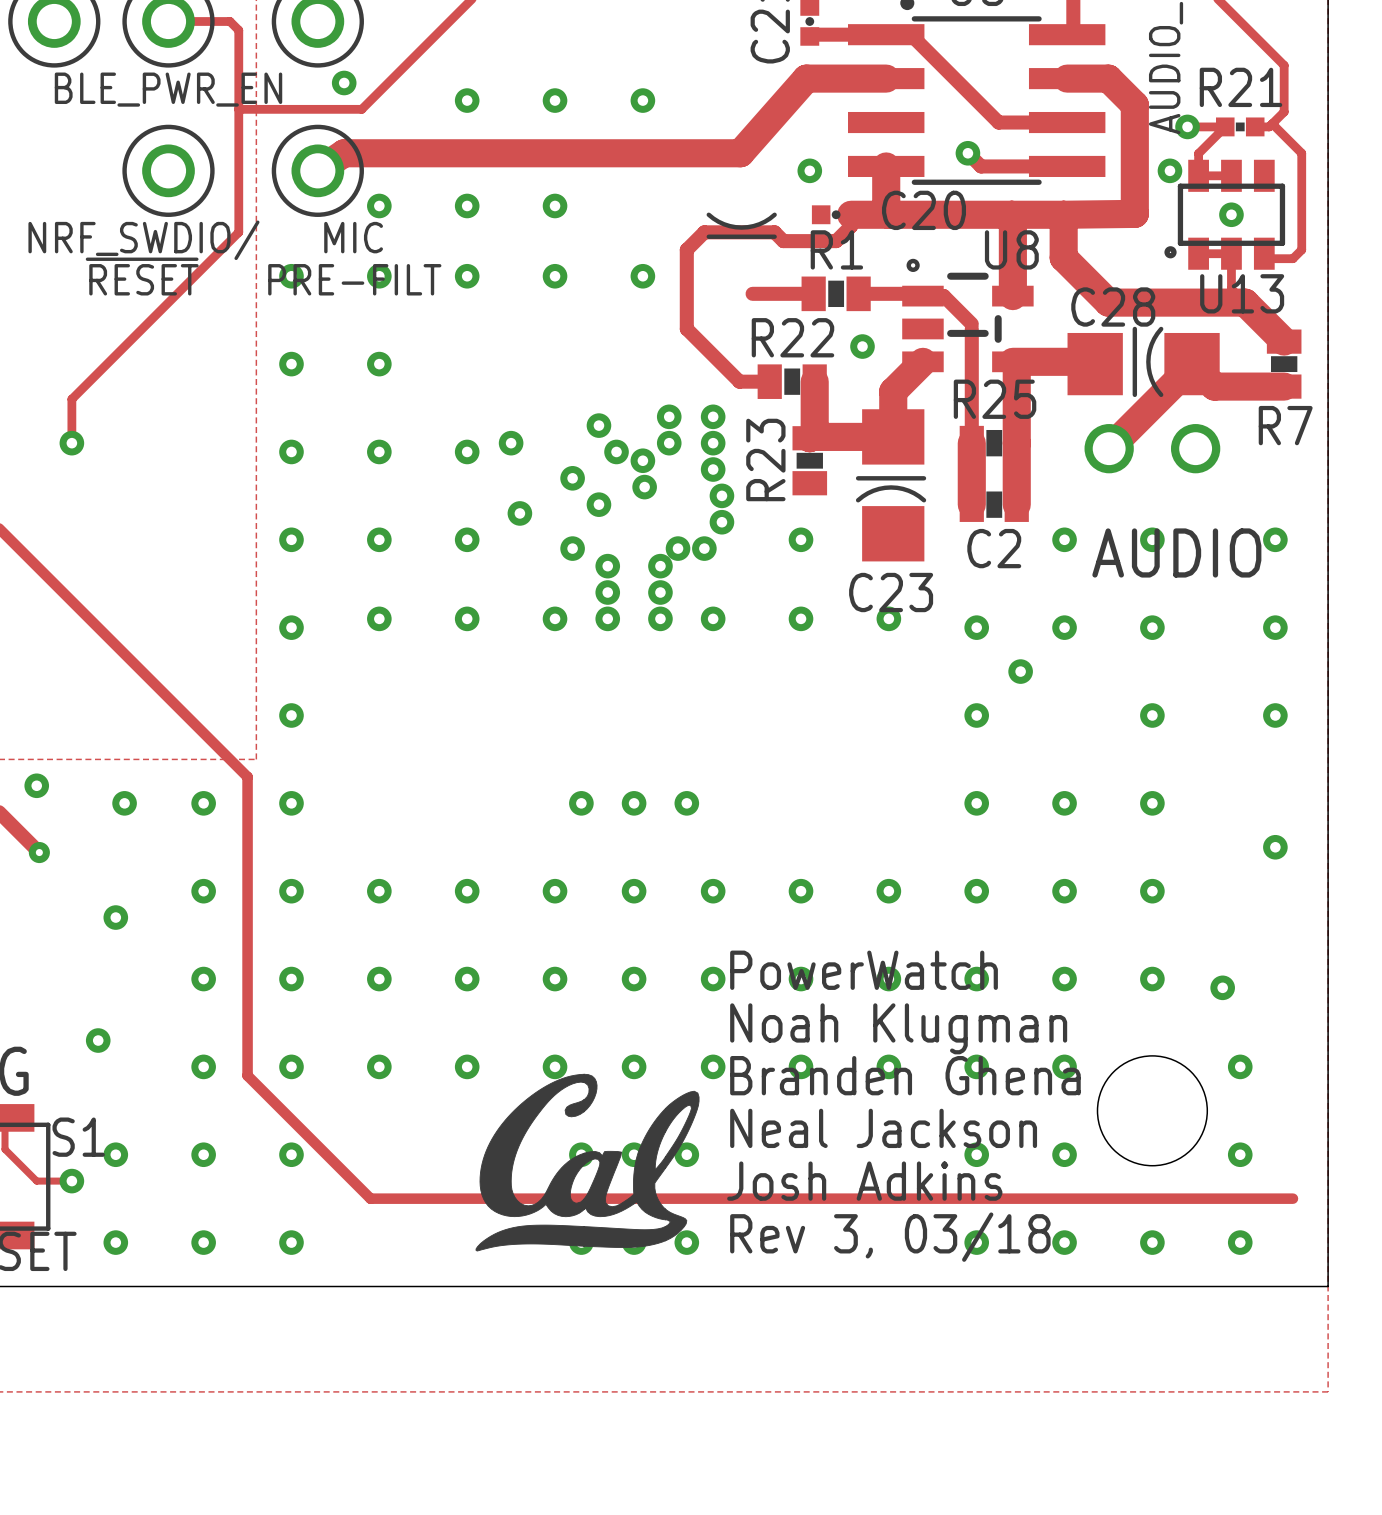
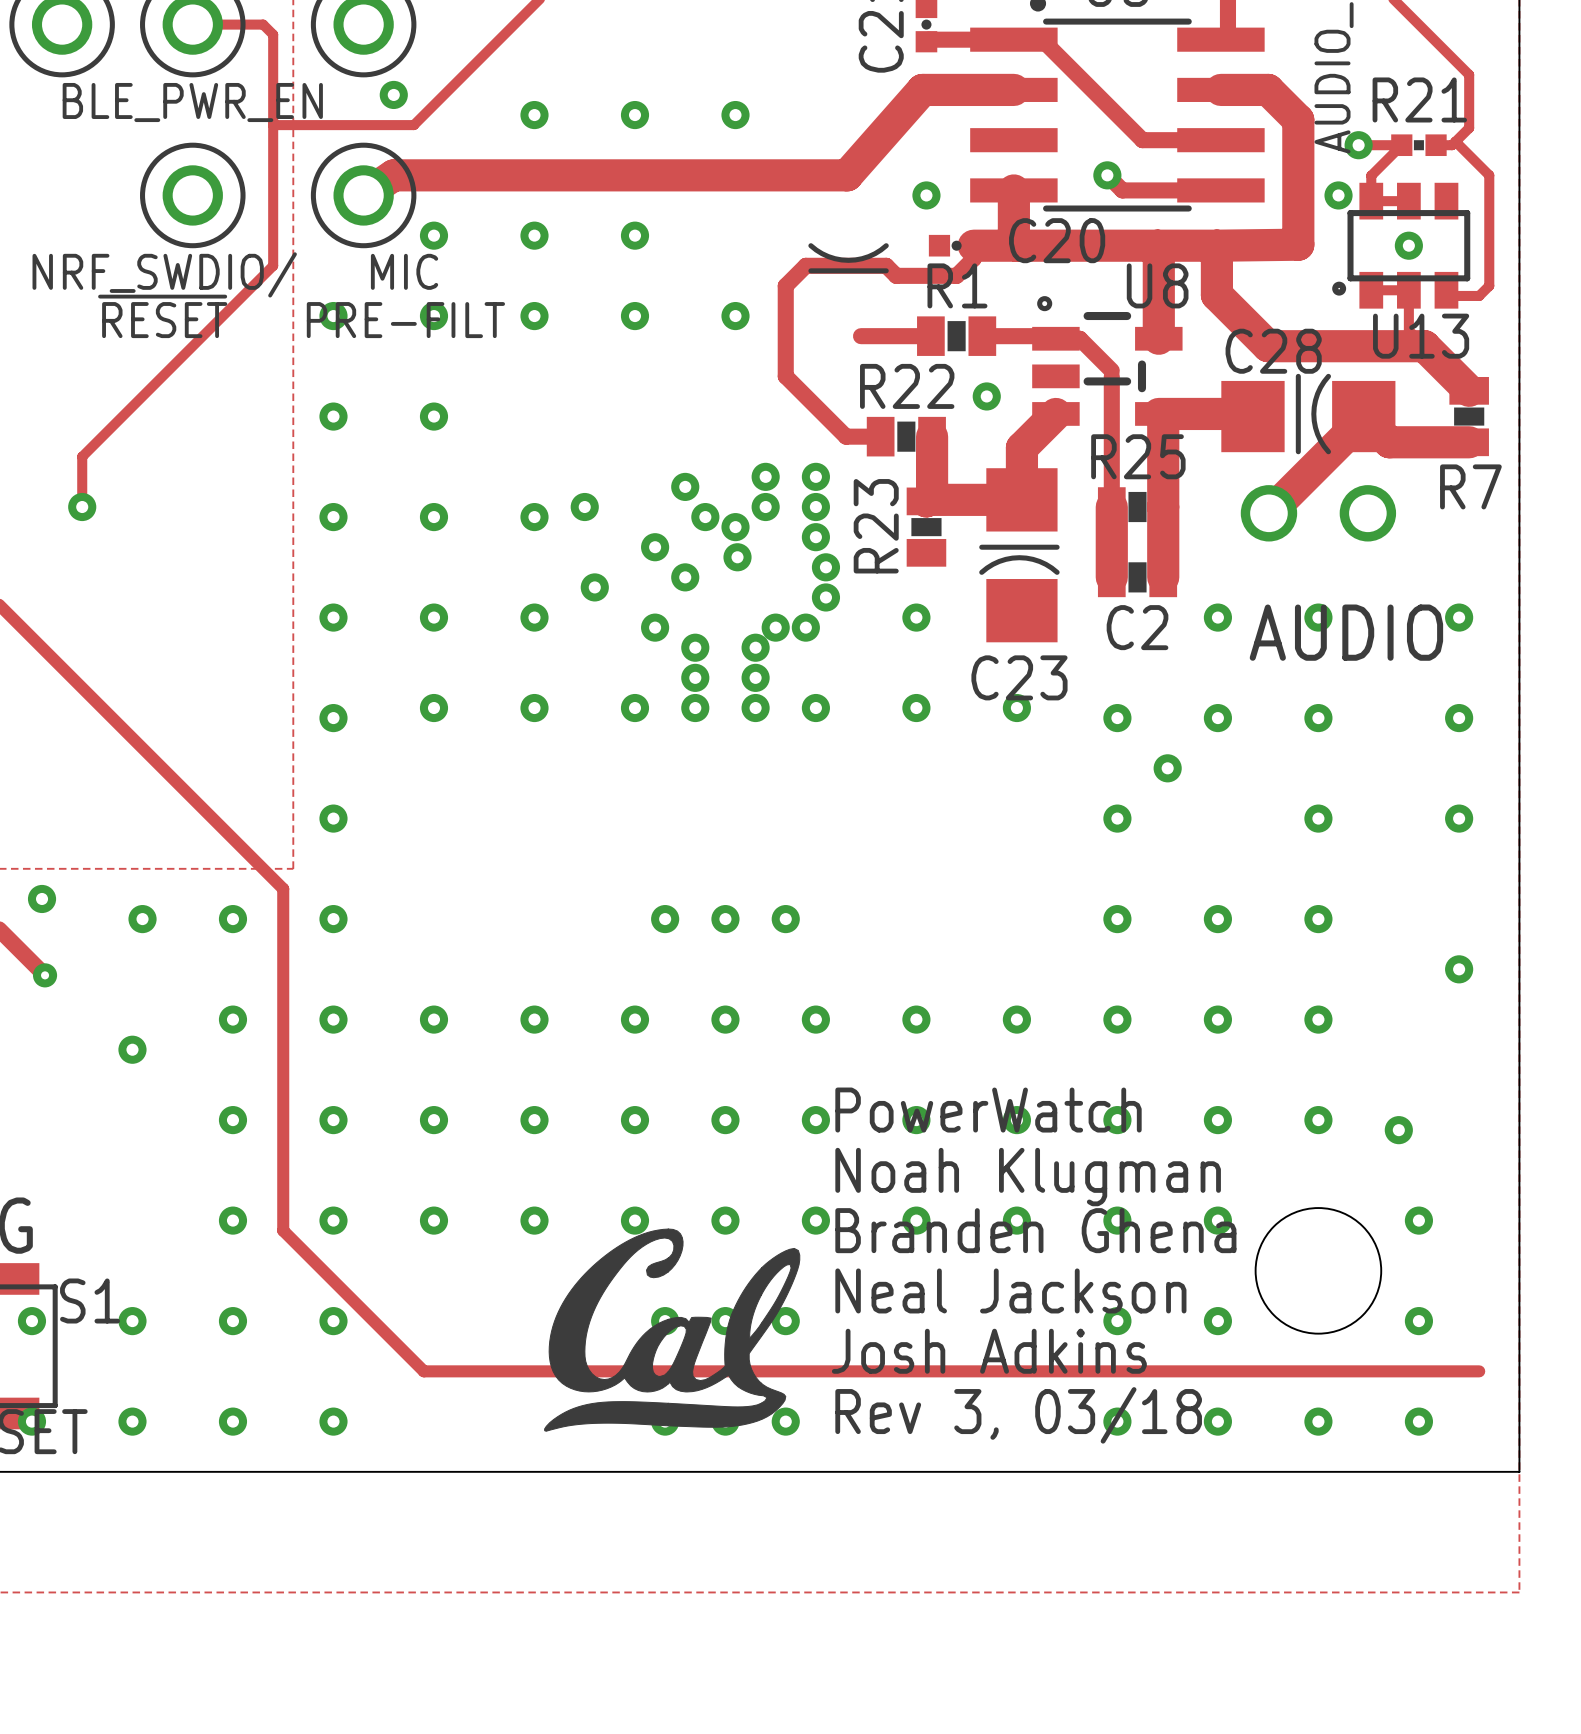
via: (98, 1040) -> none
track: (5, 1117) (5, 1149) (36, 1181) (71, 1181) -> none
via: none -> (31, 1321)
via: (71, 1181) -> none
via: none -> (31, 1421)

